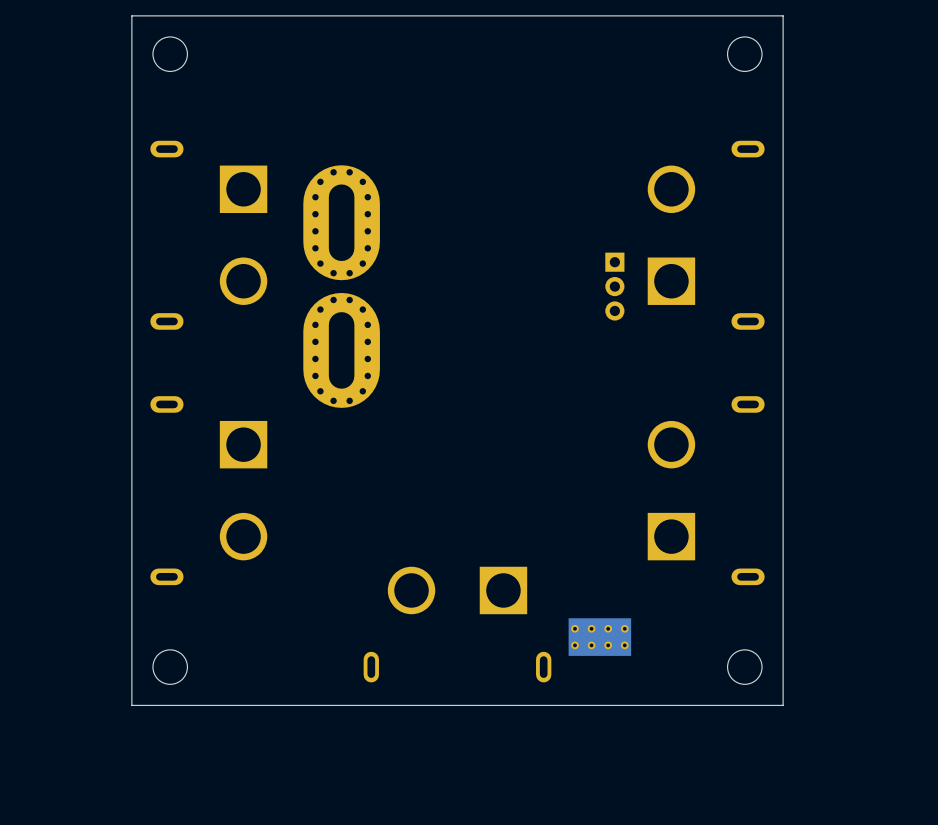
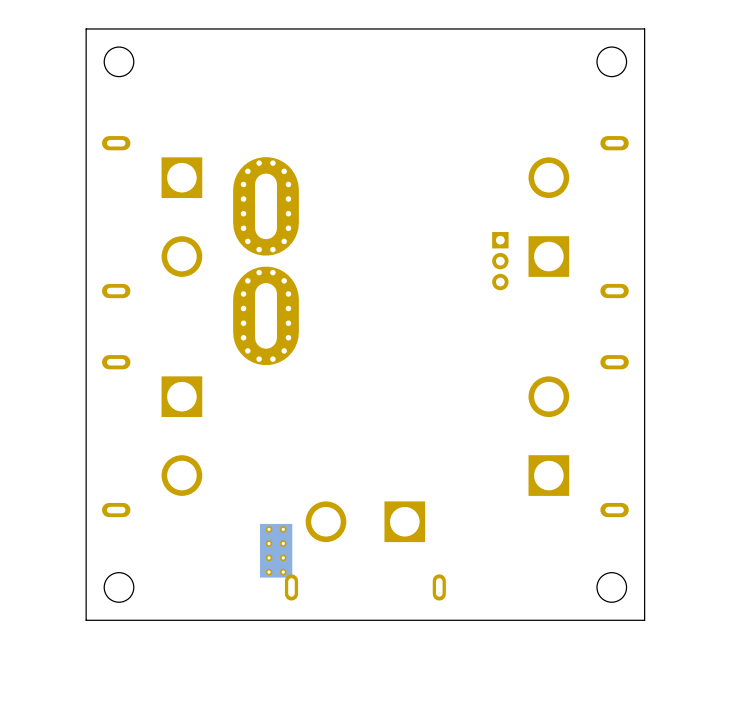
part rotation: 0° (599, 637) -> 90° clockwise (276, 550)
part position: (599, 637) -> (276, 550)

